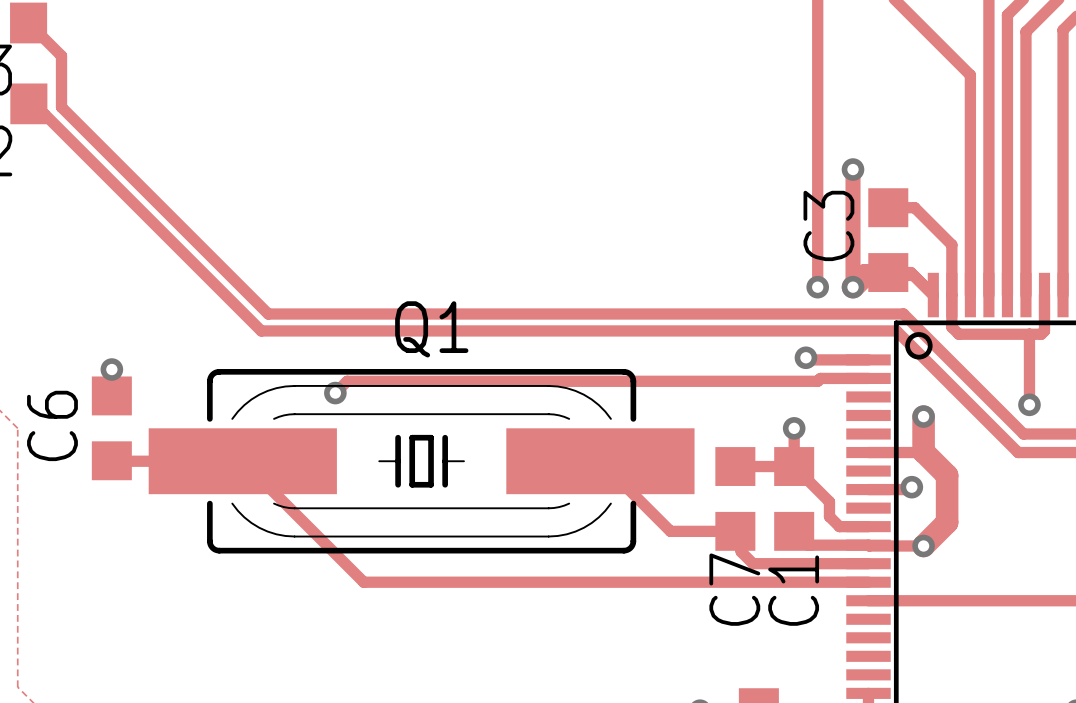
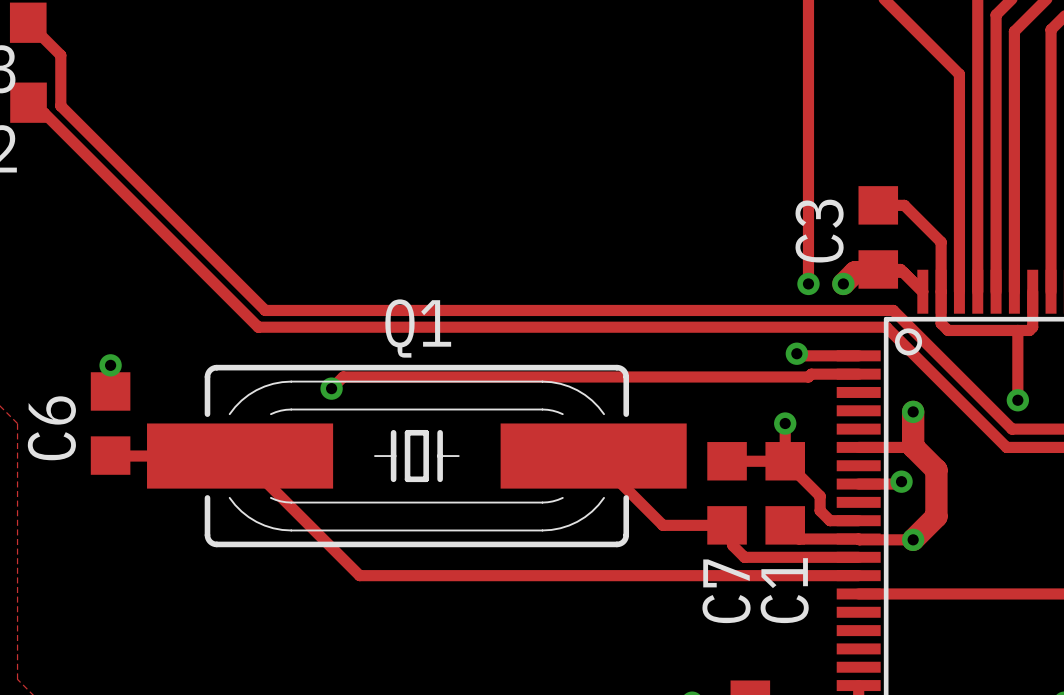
track: (853, 169) (853, 287) -> none
via: (853, 169) -> none

